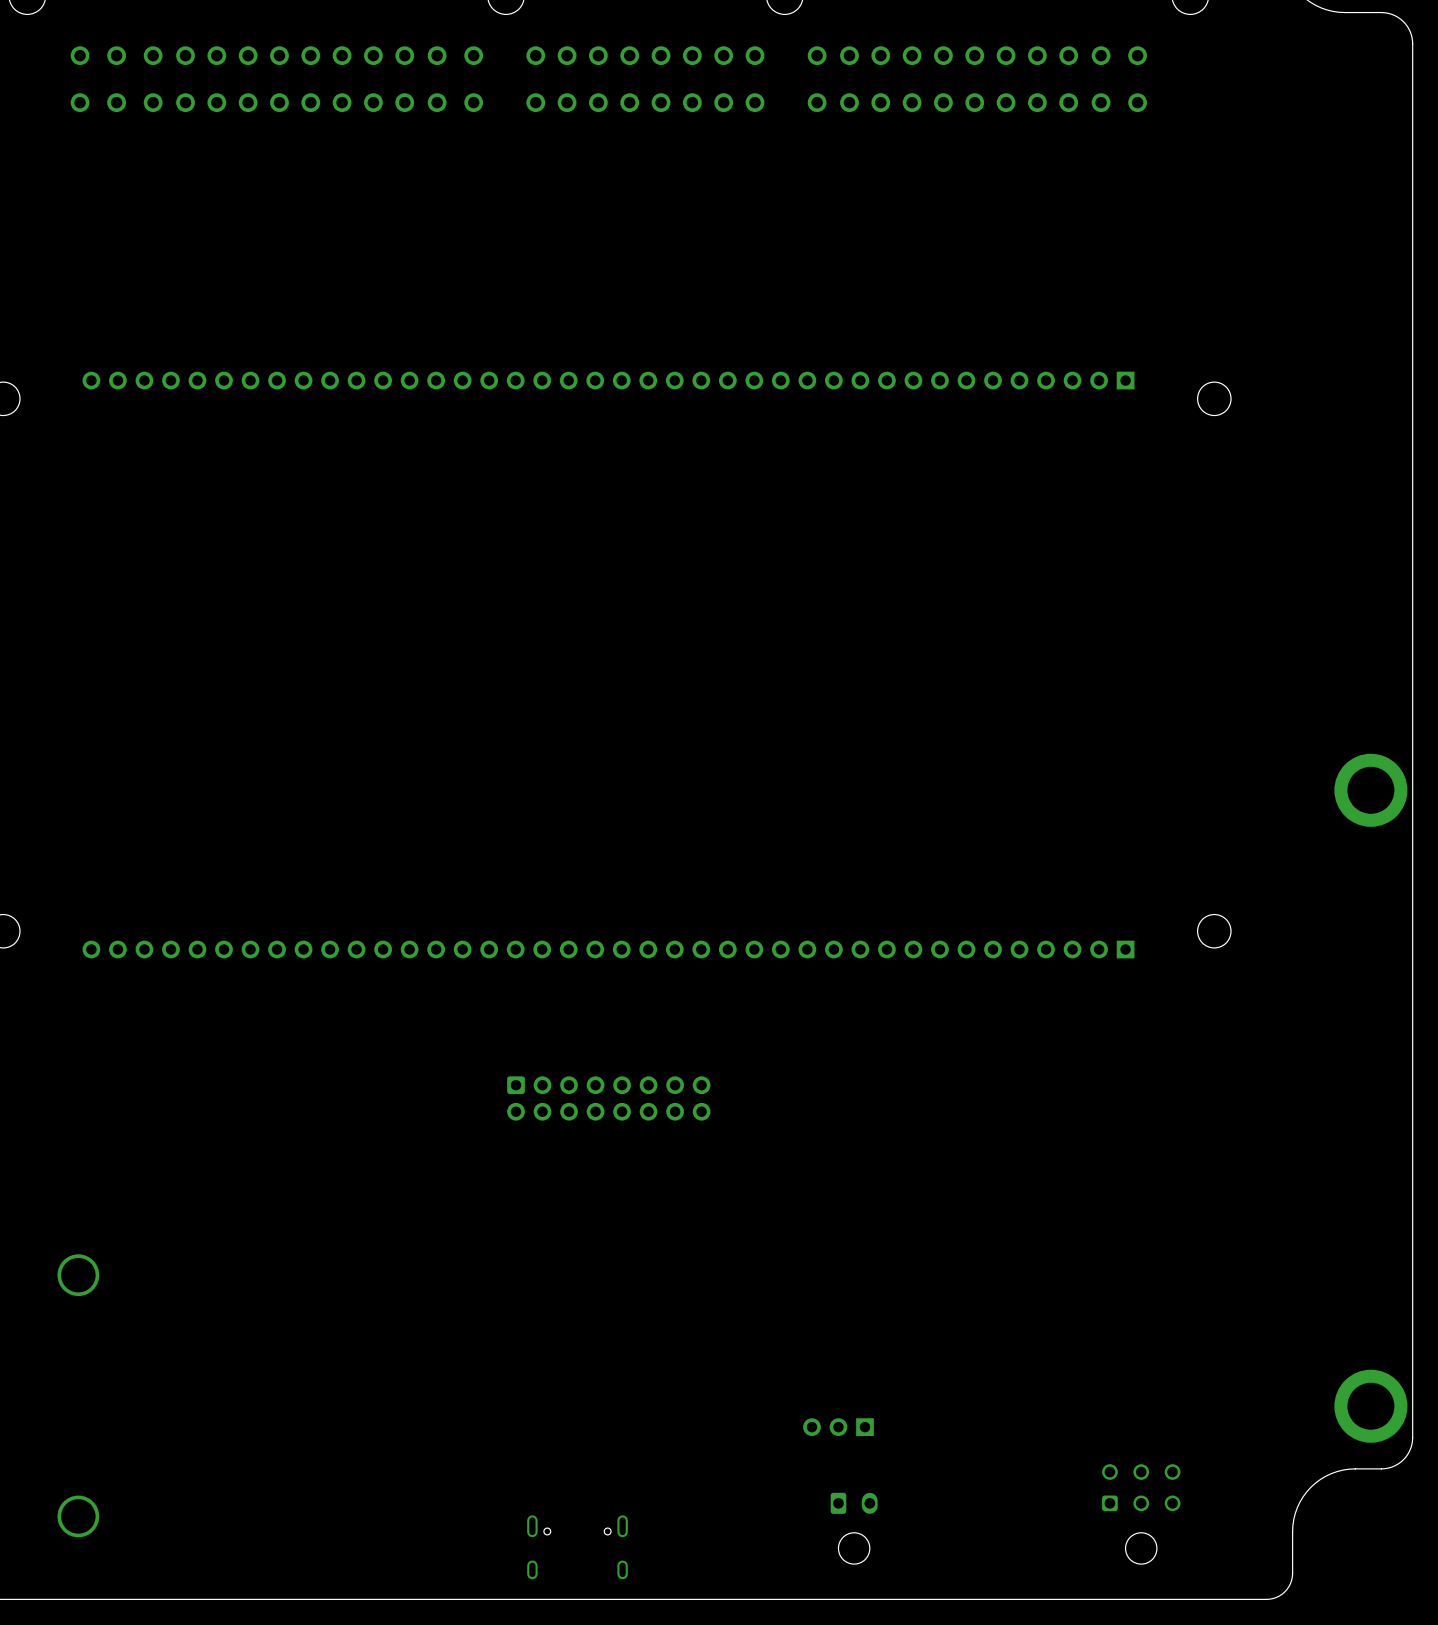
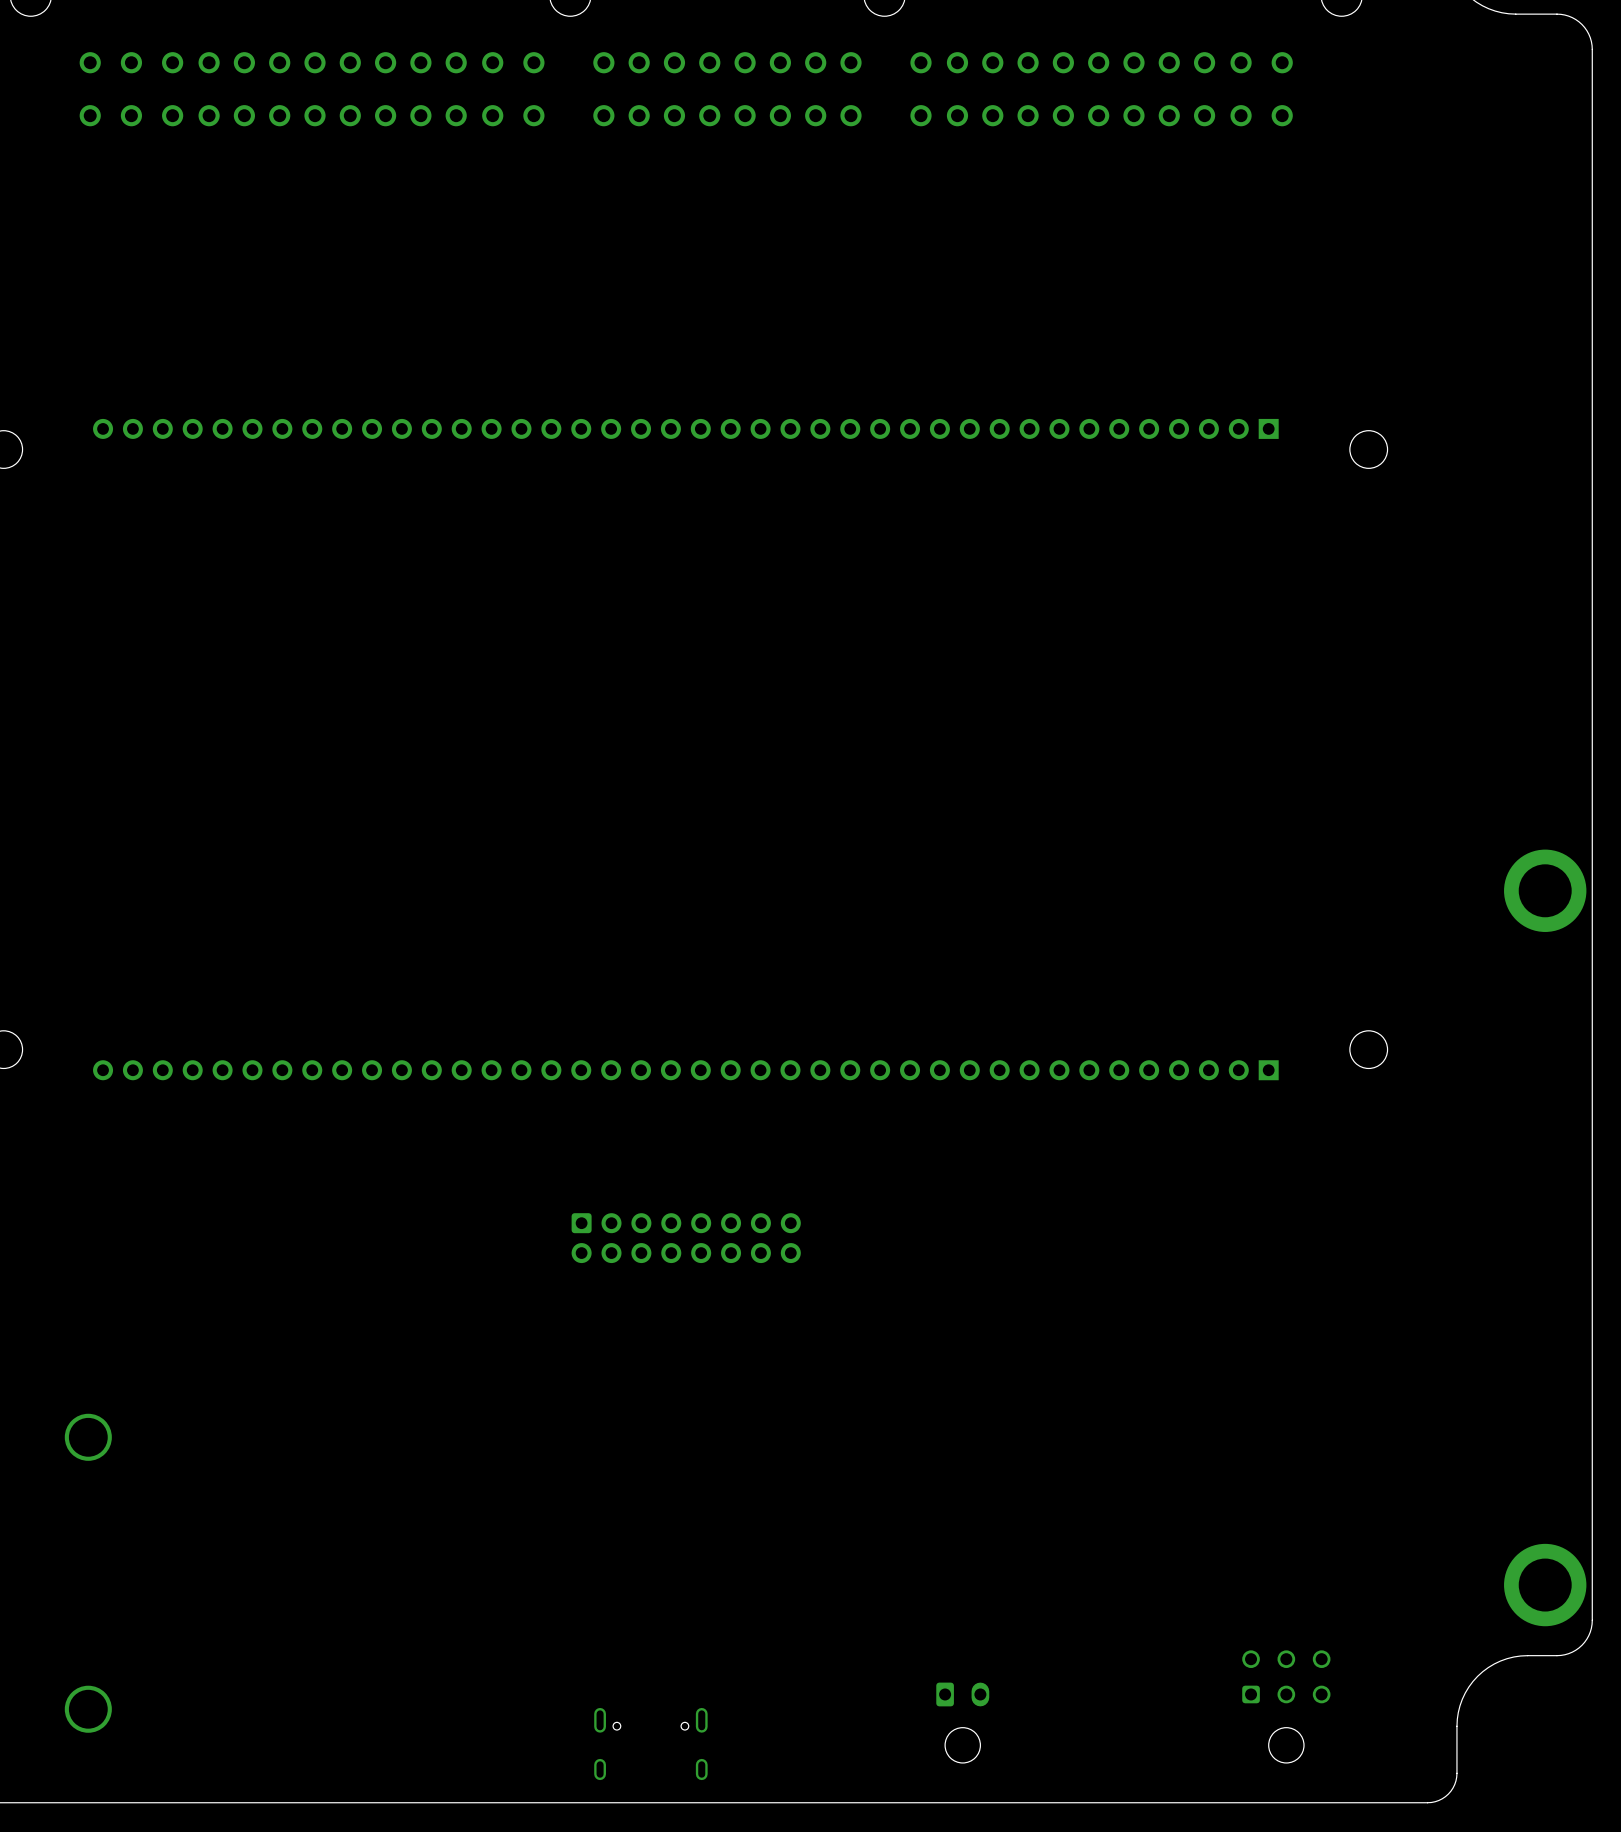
part: (838, 1427) -> none

